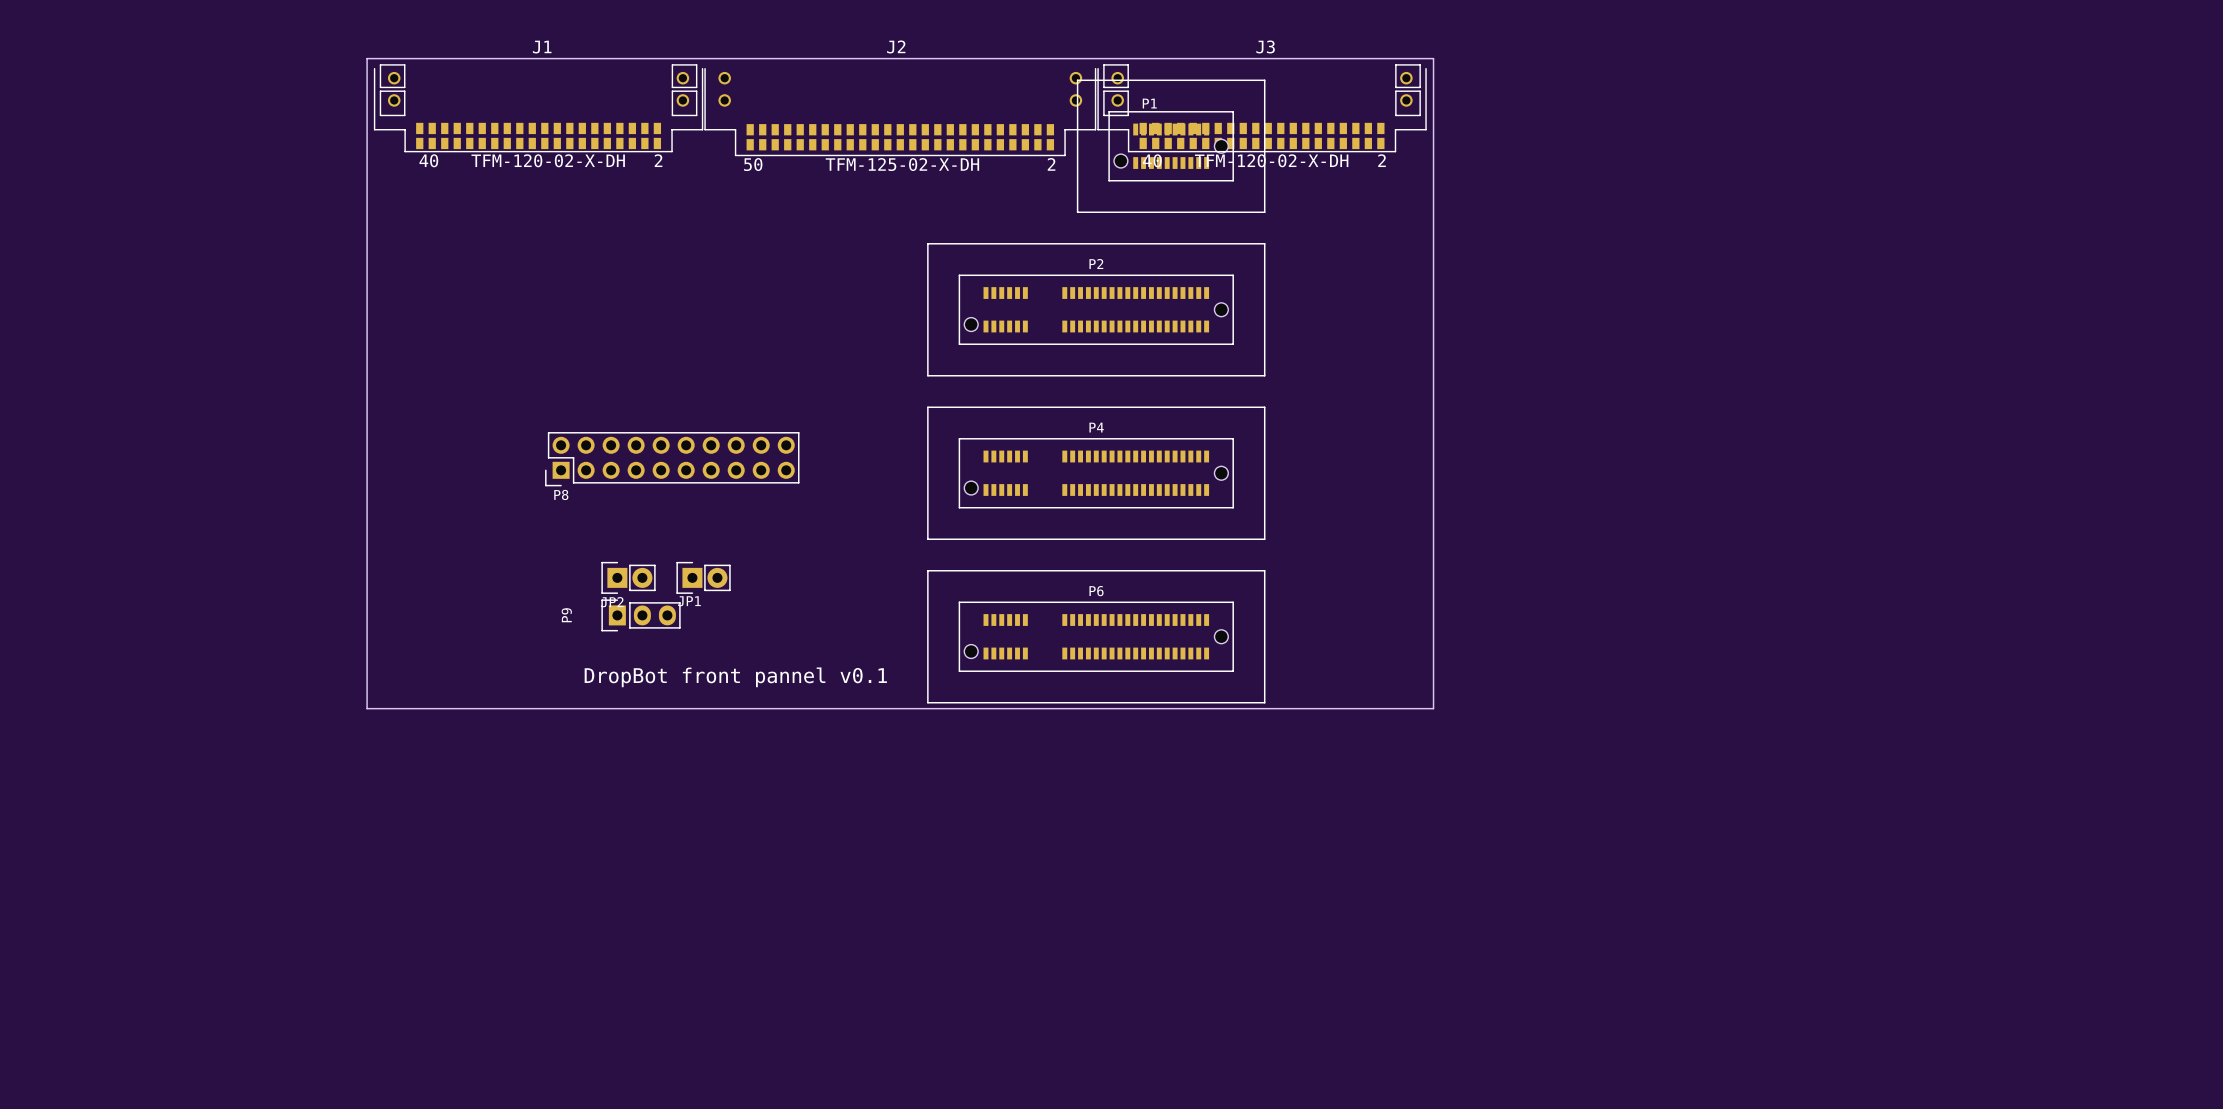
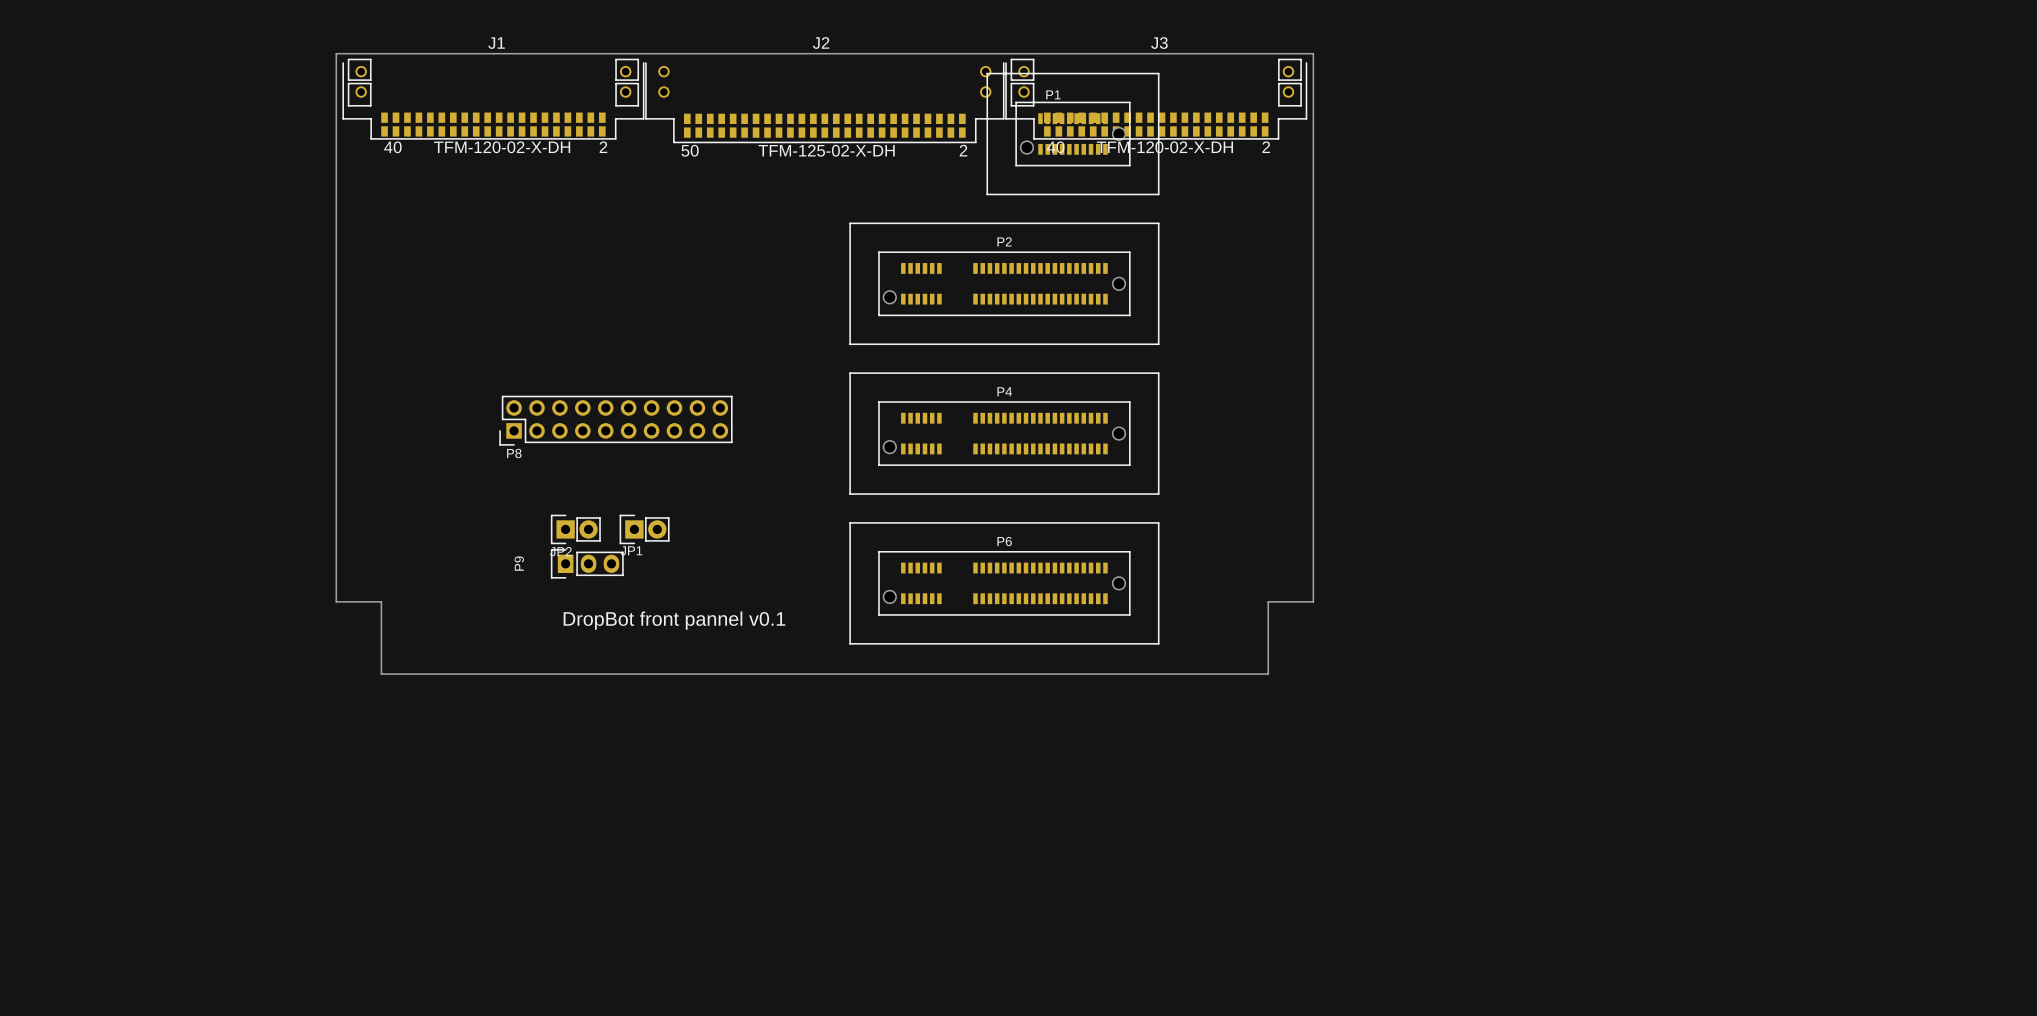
board edge: (367, 656) (367, 708) (1433, 708) (1433, 656) -> (336, 601) (381, 601) (381, 674) (1268, 674) (1268, 601) (1313, 601)

